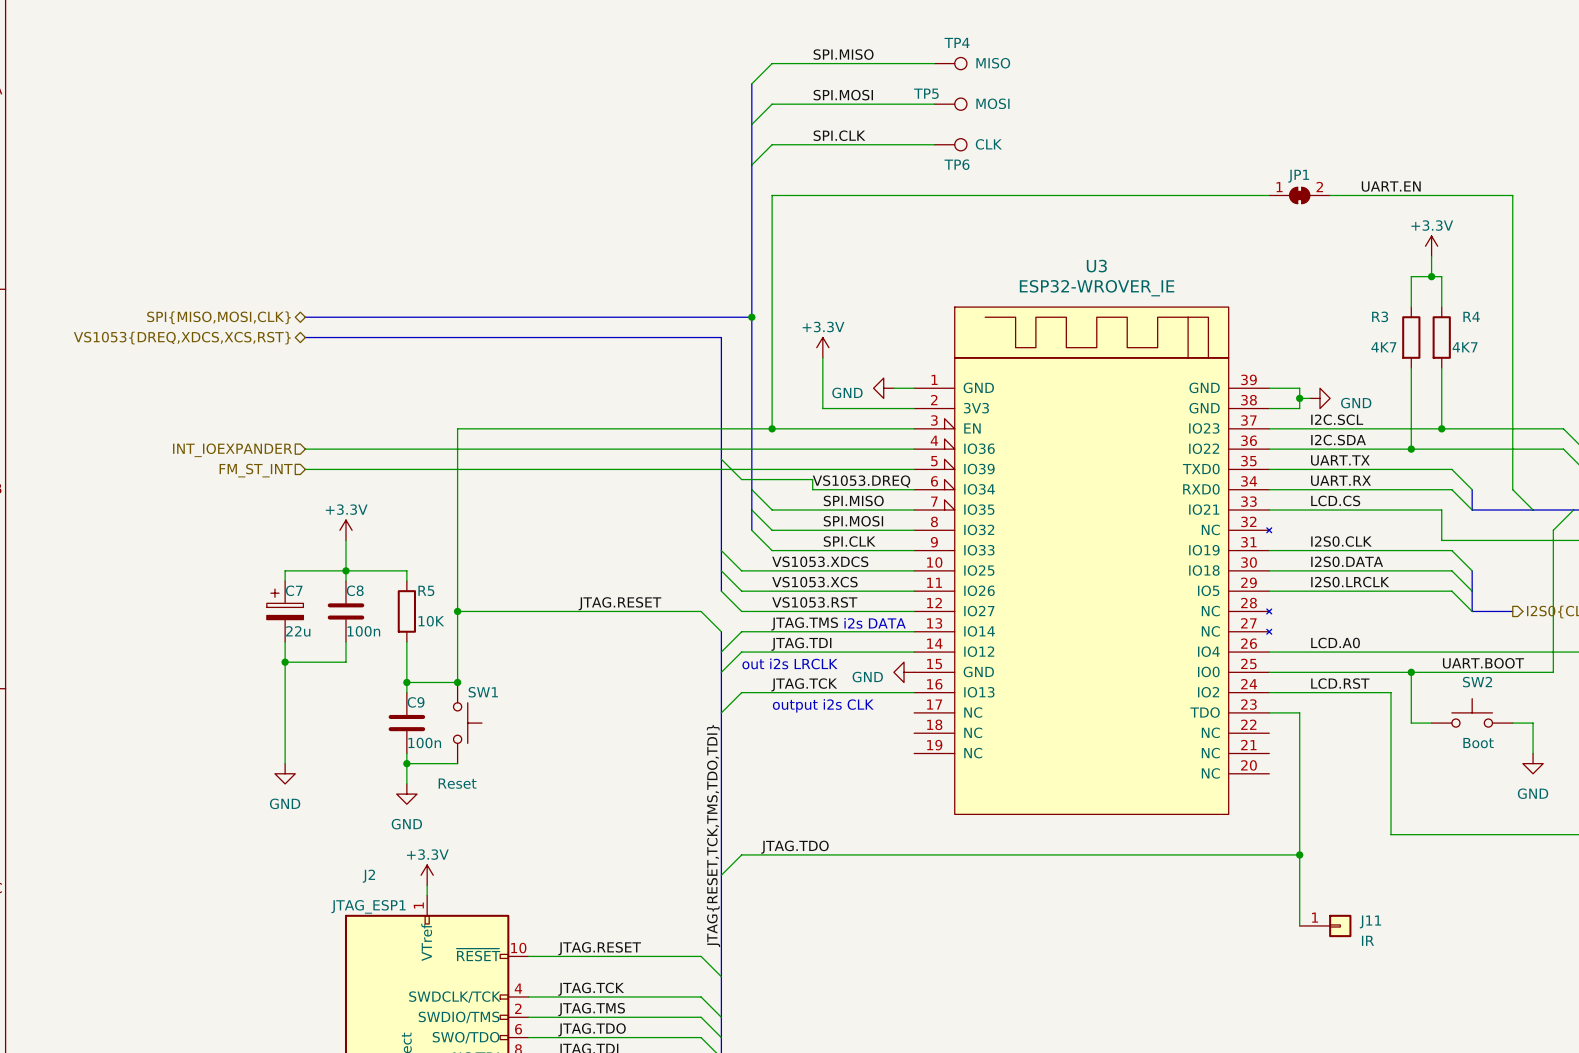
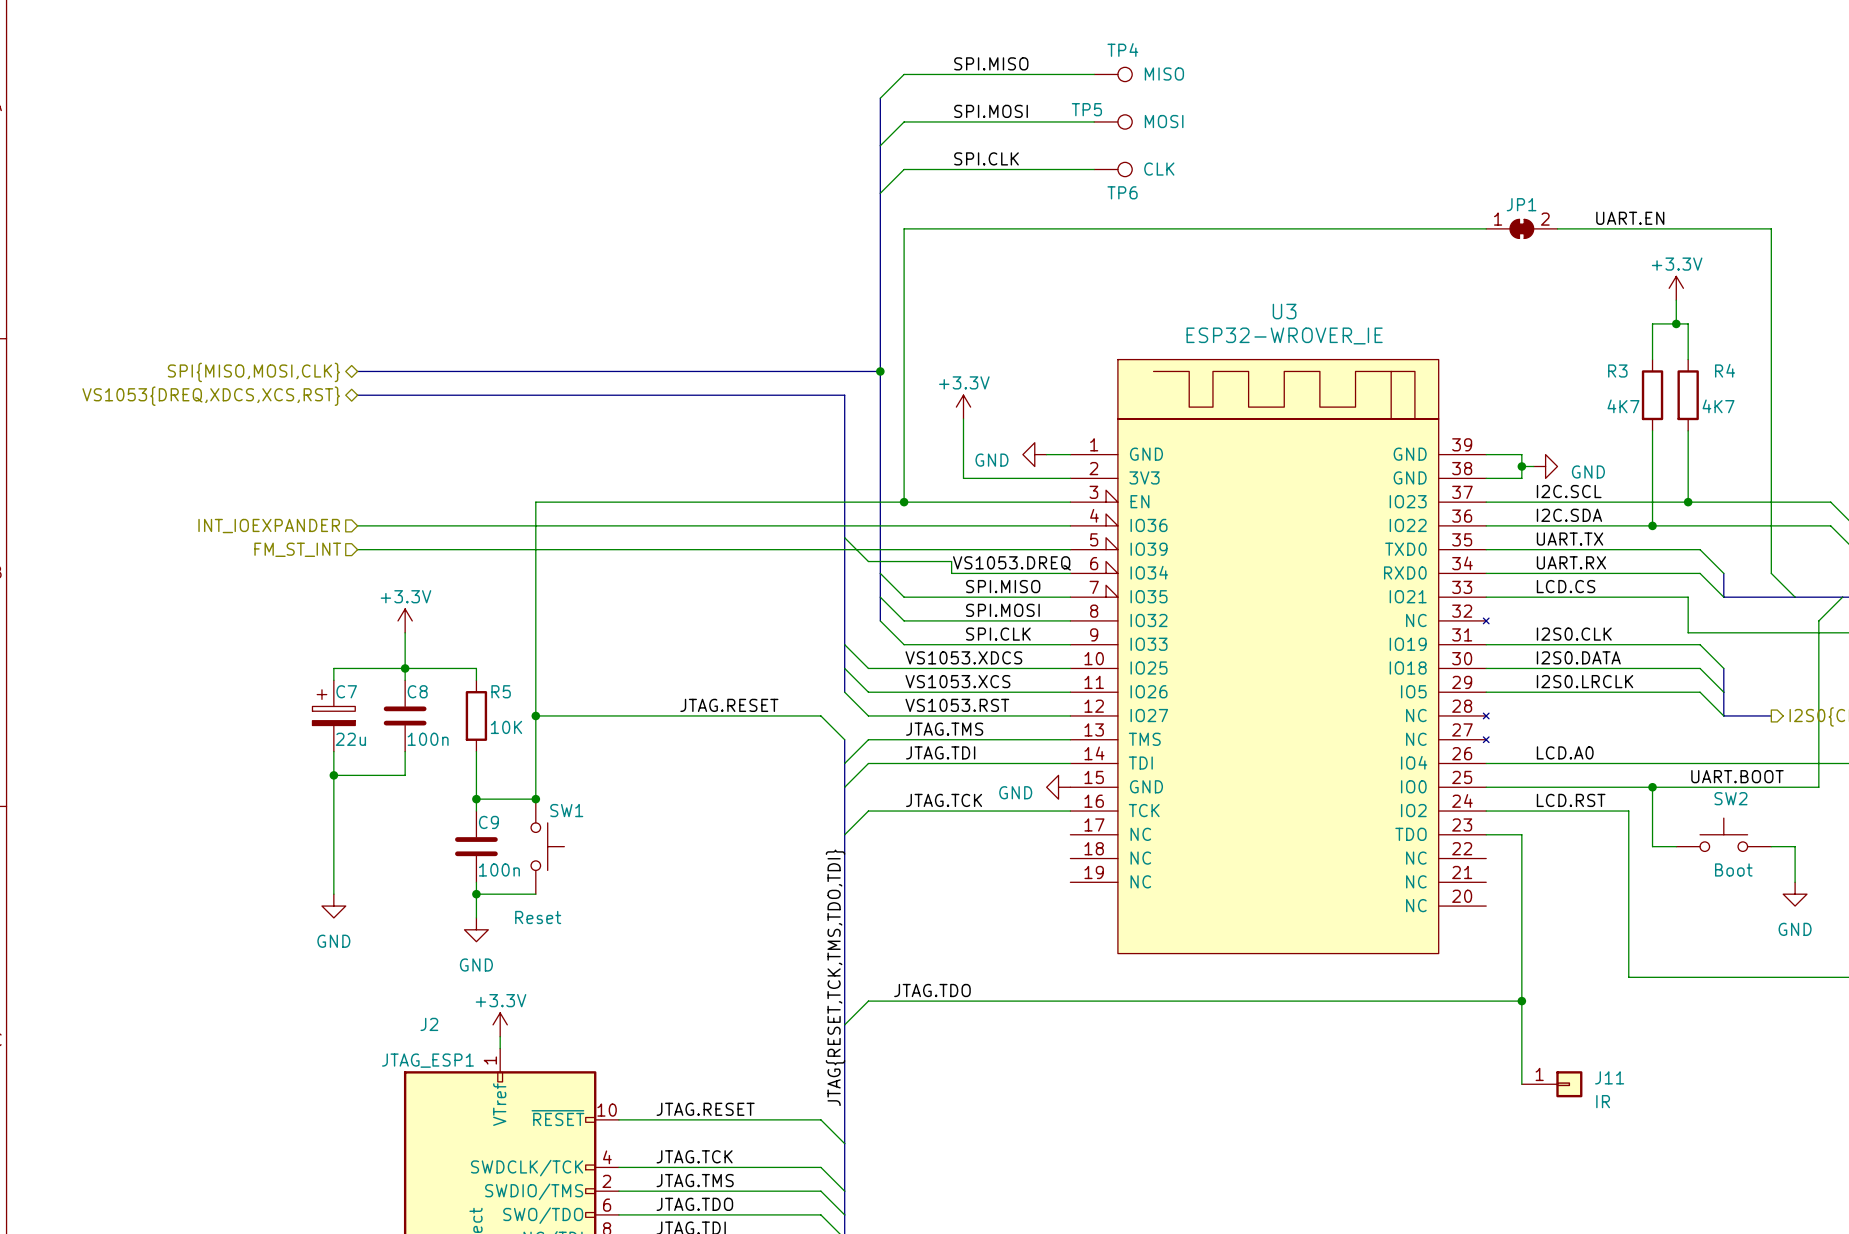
text: i2s DATA (875, 623) -> none
U3 pin name: IO14 (979, 631) -> TMS (1144, 739)
U3 pin name: IO12 (979, 651) -> TDI (1140, 763)
text: out i2s LRCLK (790, 663) -> none
U3 pin name: IO13 (979, 692) -> TCK (1144, 810)
text: output i2s CLK (823, 705) -> none

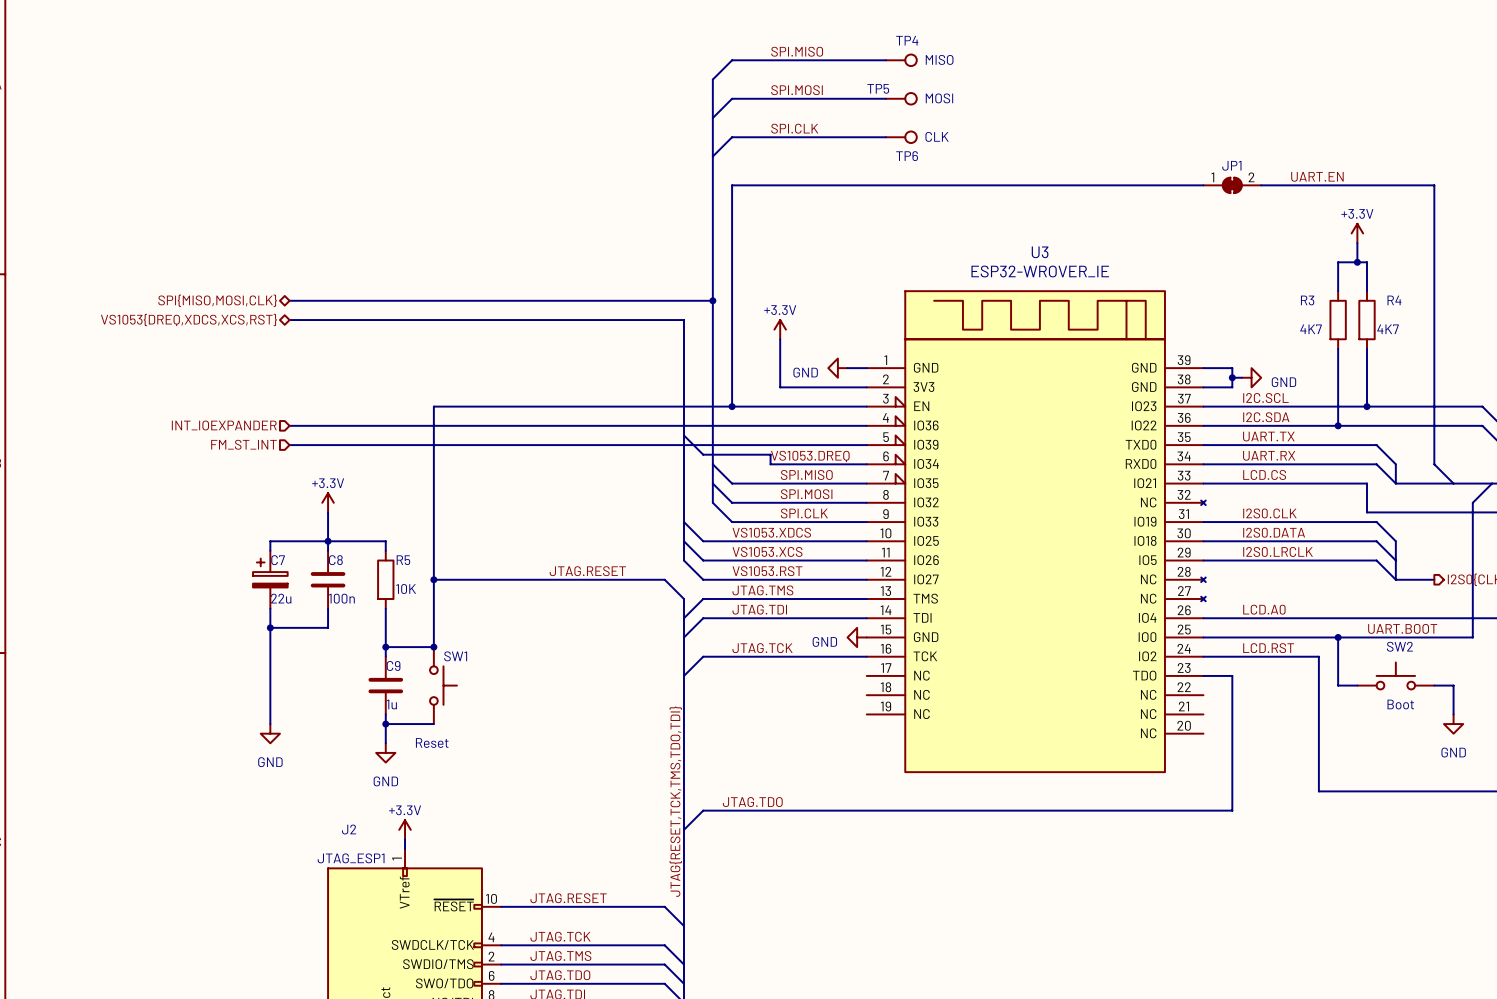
C9 value: 100n (499, 869) -> 1u (391, 704)
wire: (1521, 1001) (1521, 1084) -> none
junction: (1521, 1001) -> none
J11: IR (1552, 1084) -> none

